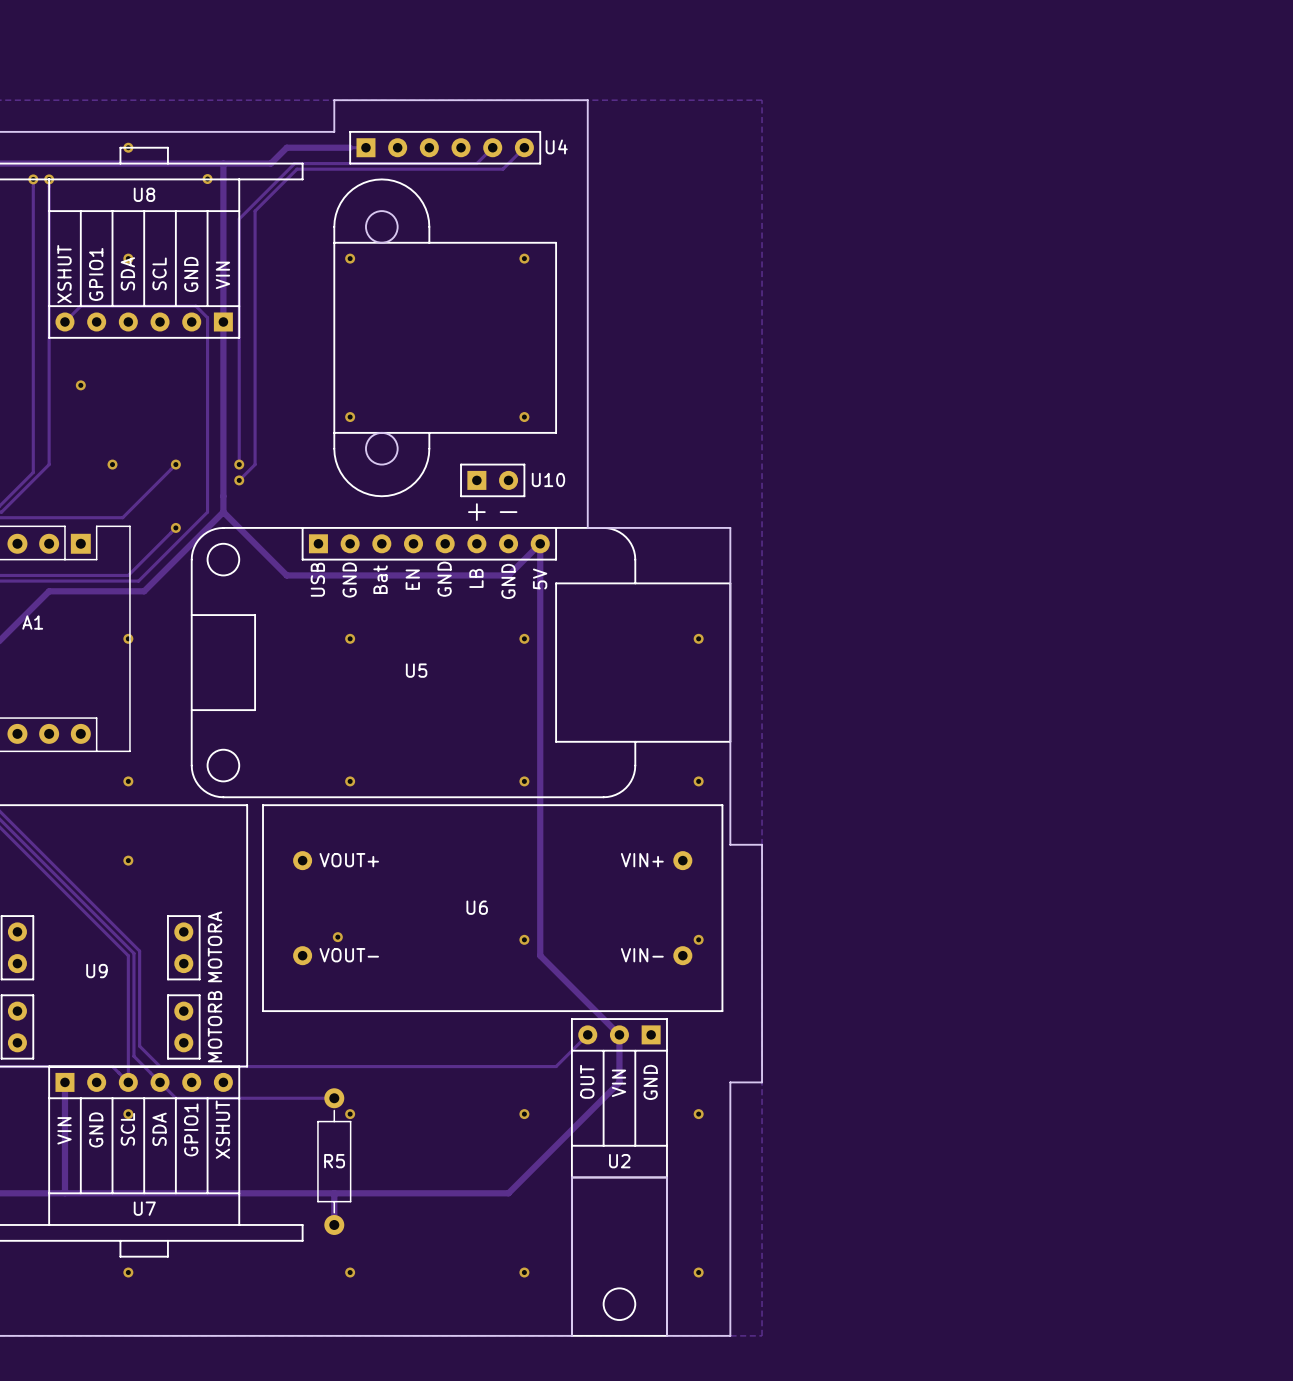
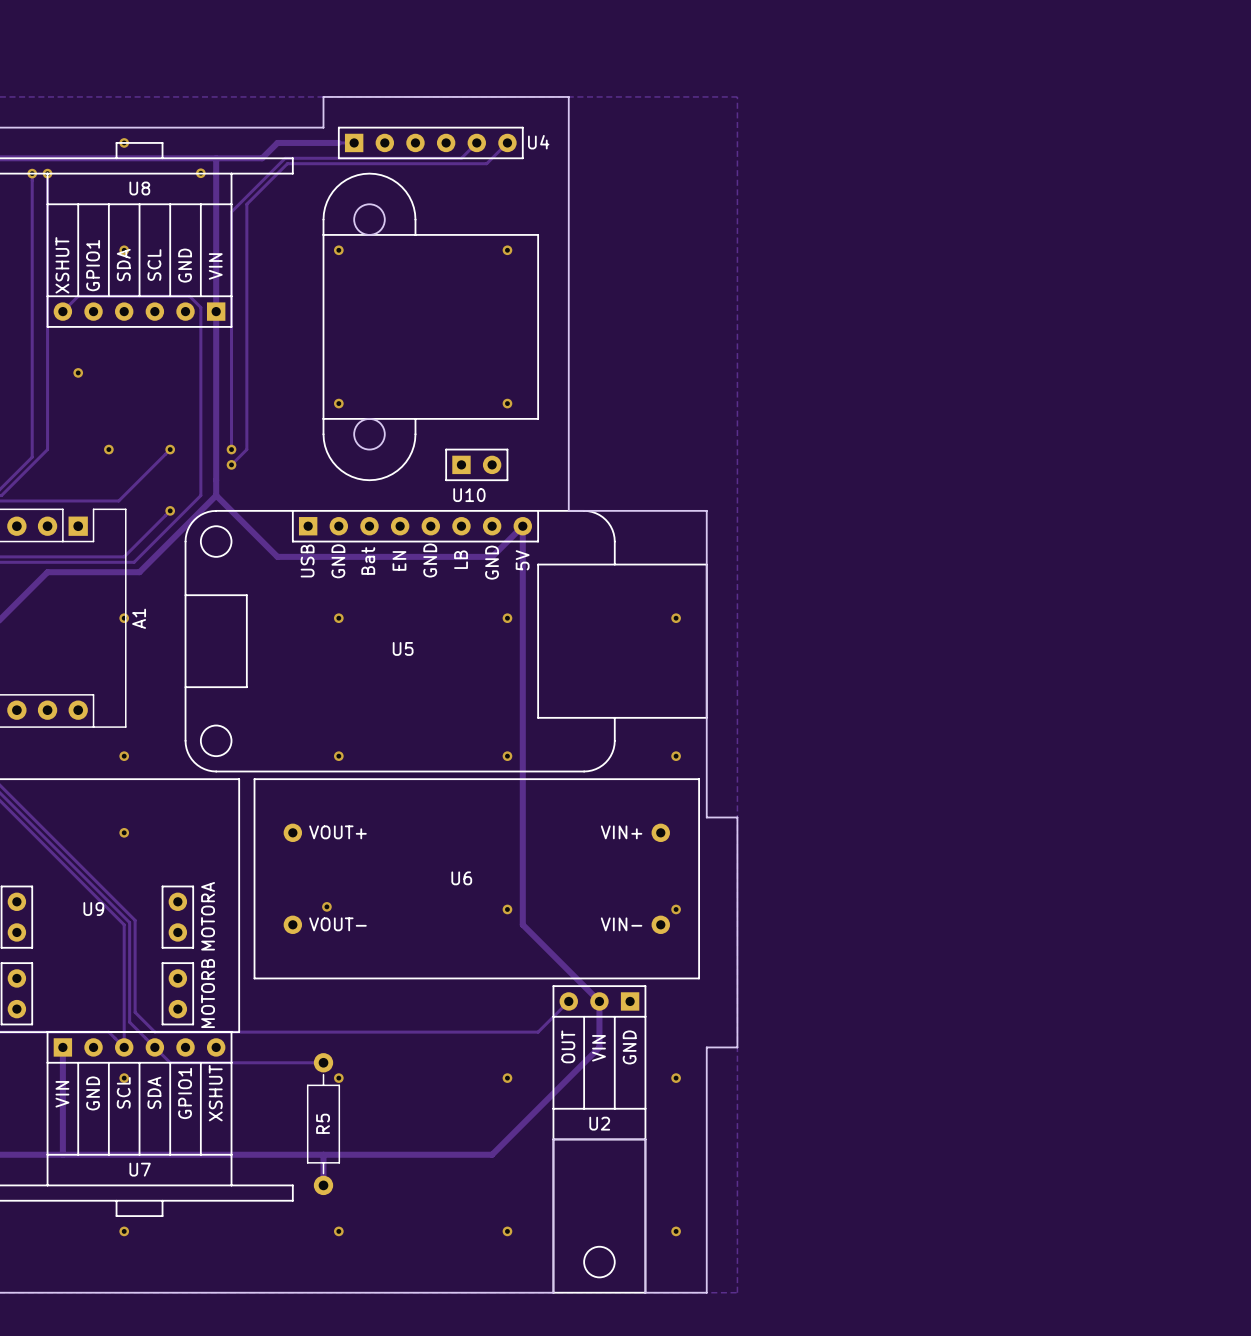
U10 name position: U10 (548, 479) -> U10 (469, 495)
line: (476, 504) (476, 520) -> none
line: (468, 512) (484, 512) -> none
line: (500, 512) (516, 512) -> none
A1 name rotation: 0° (32, 622) -> 90° counterclockwise (139, 618)
A1 name position: A1 (32, 622) -> A1 (139, 618)
U9 name position: U9 (96, 971) -> U9 (93, 909)
R5 name rotation: 0° (334, 1161) -> 90° counterclockwise (323, 1123)

